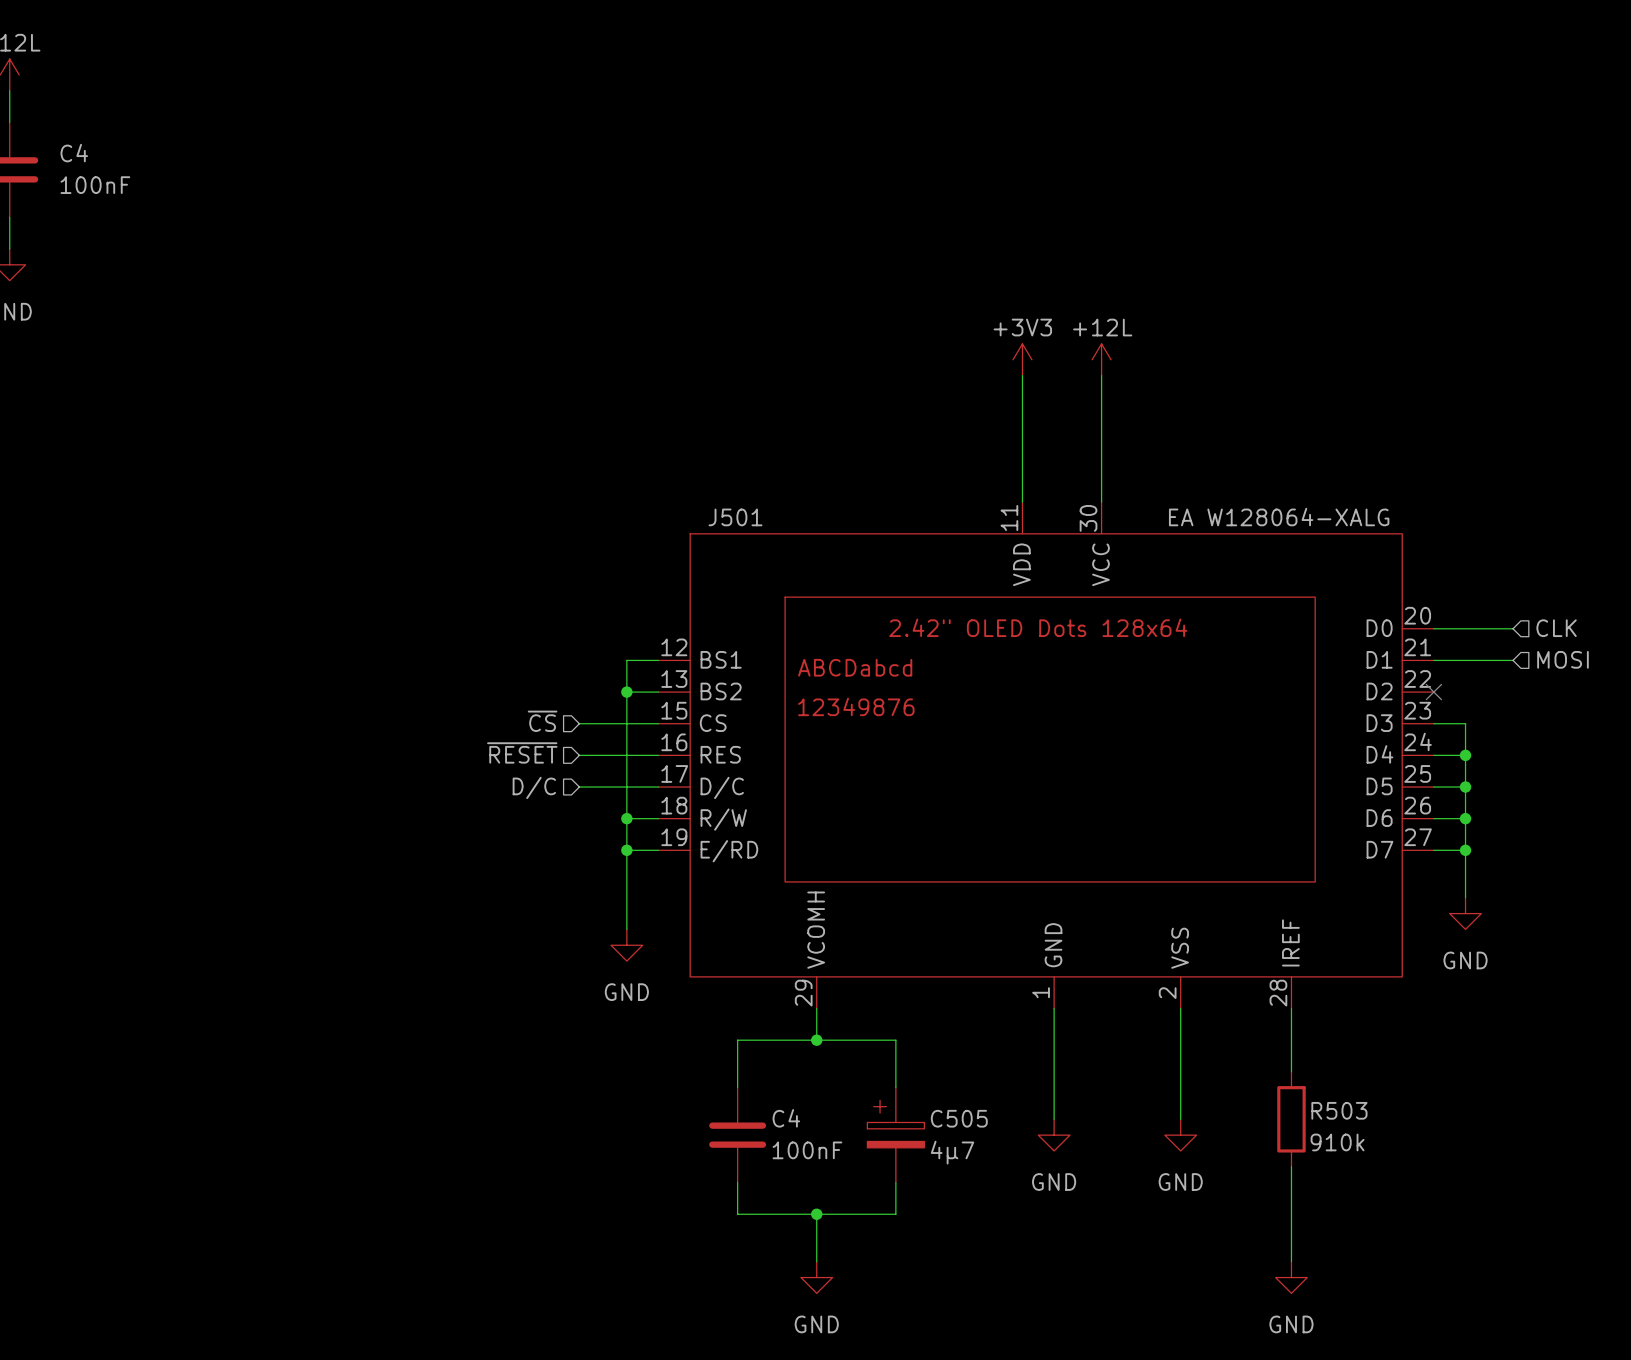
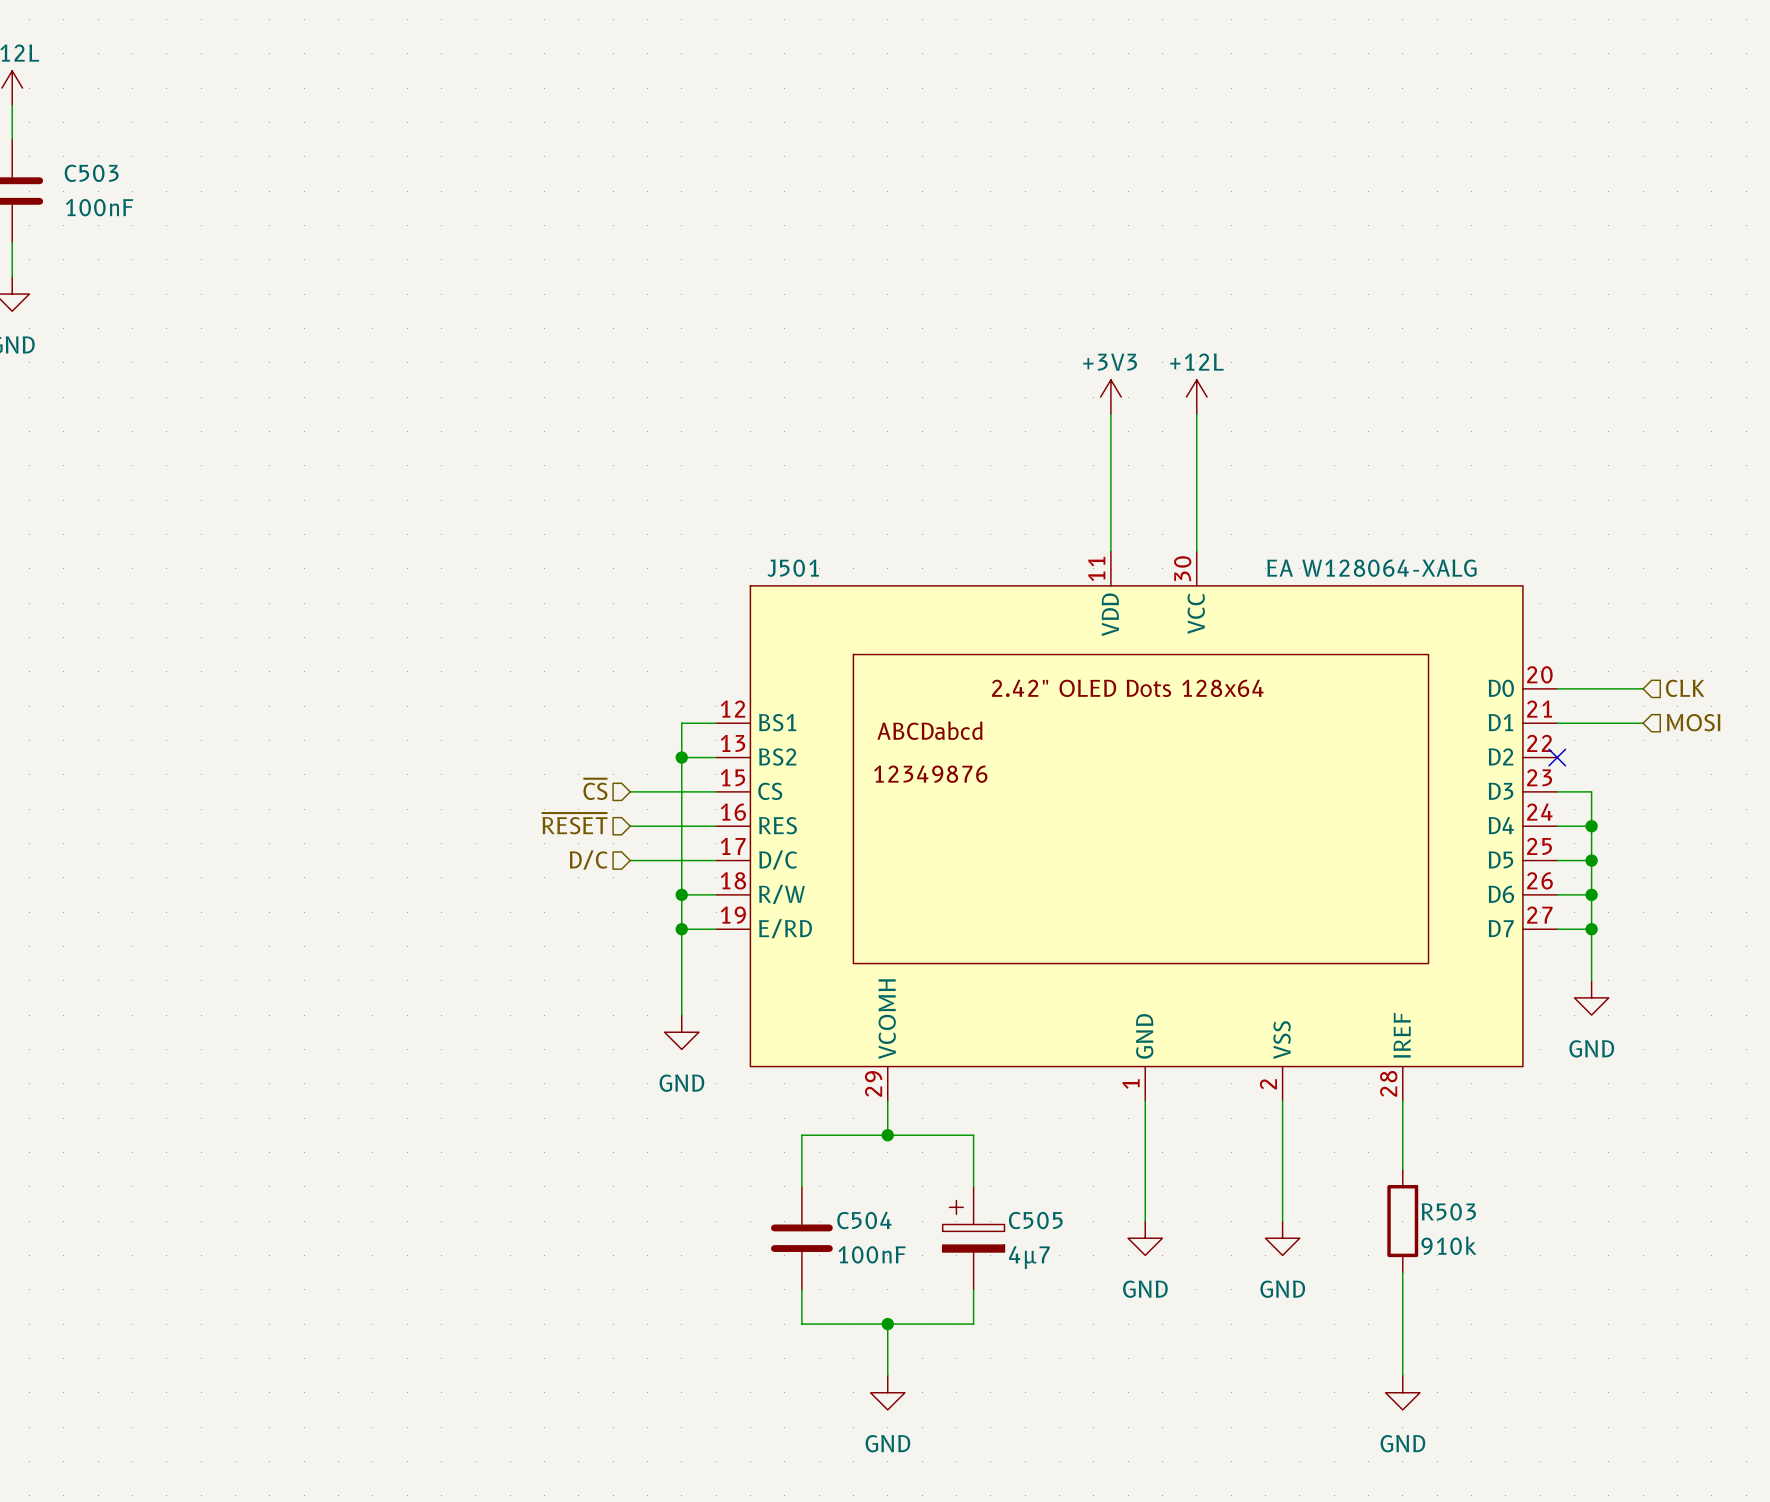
C4 name: C4 (74, 153) -> C503 (91, 173)
C4 name: C4 (786, 1118) -> C504 (864, 1220)

